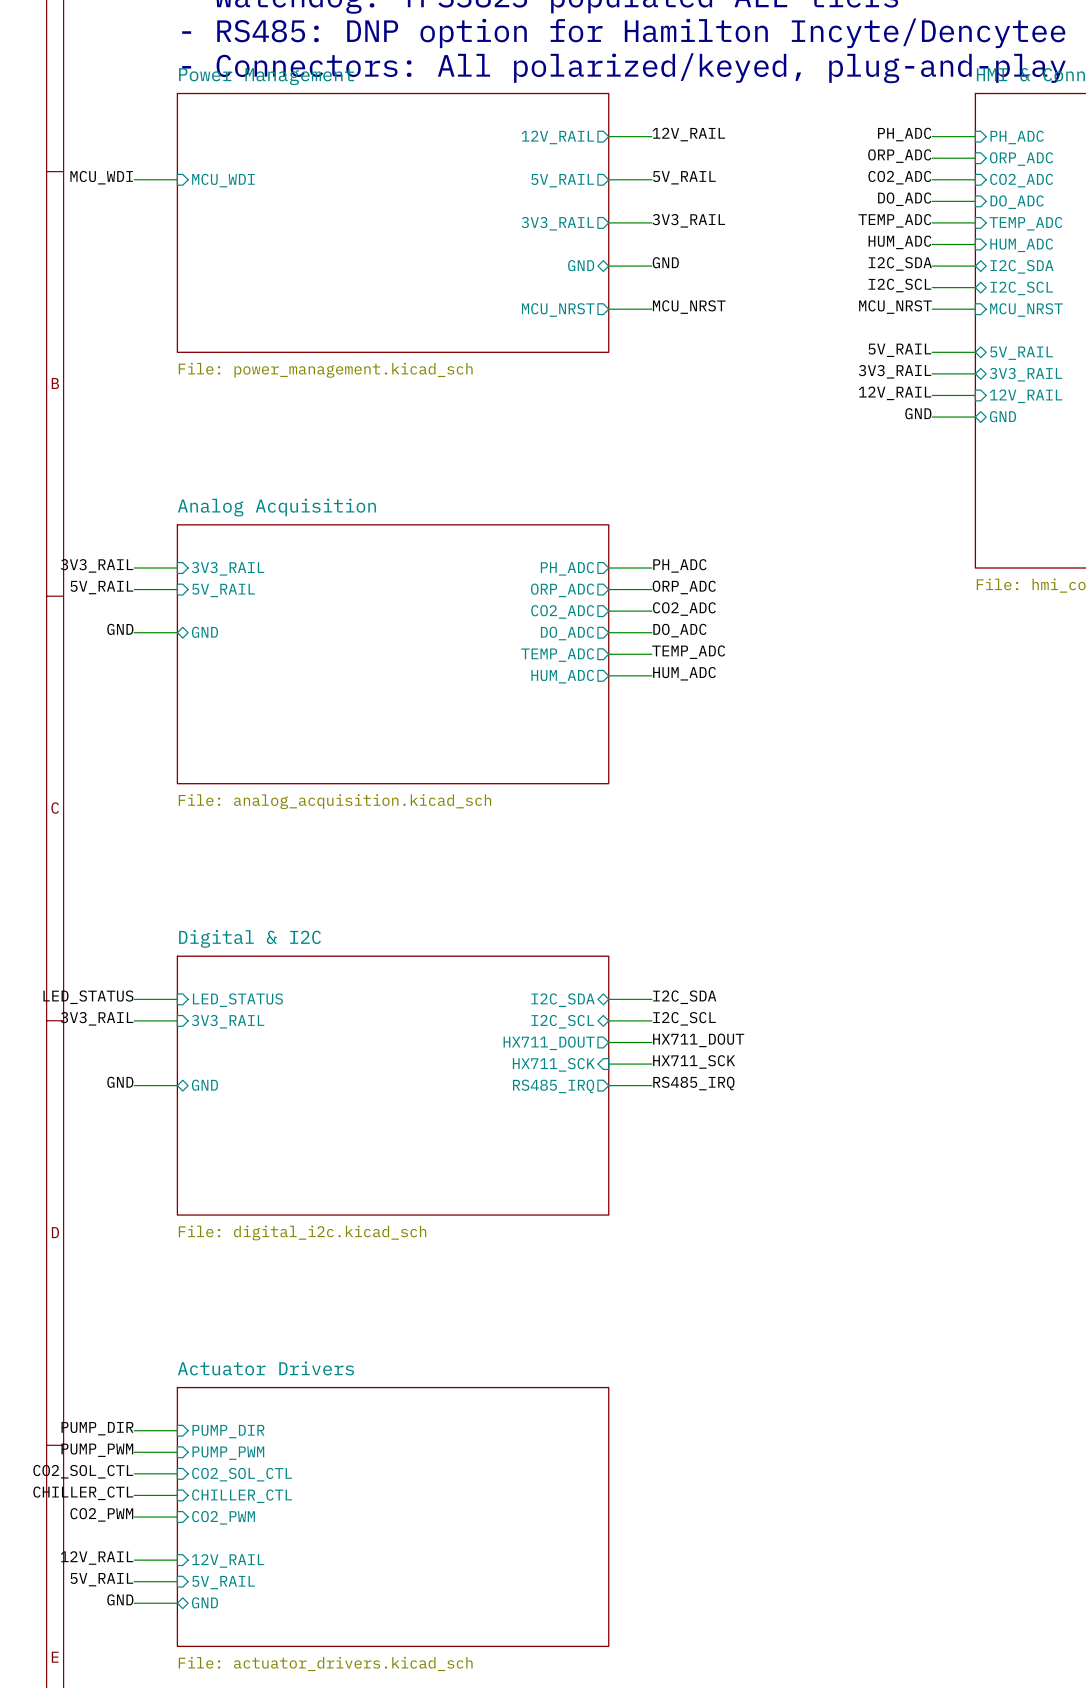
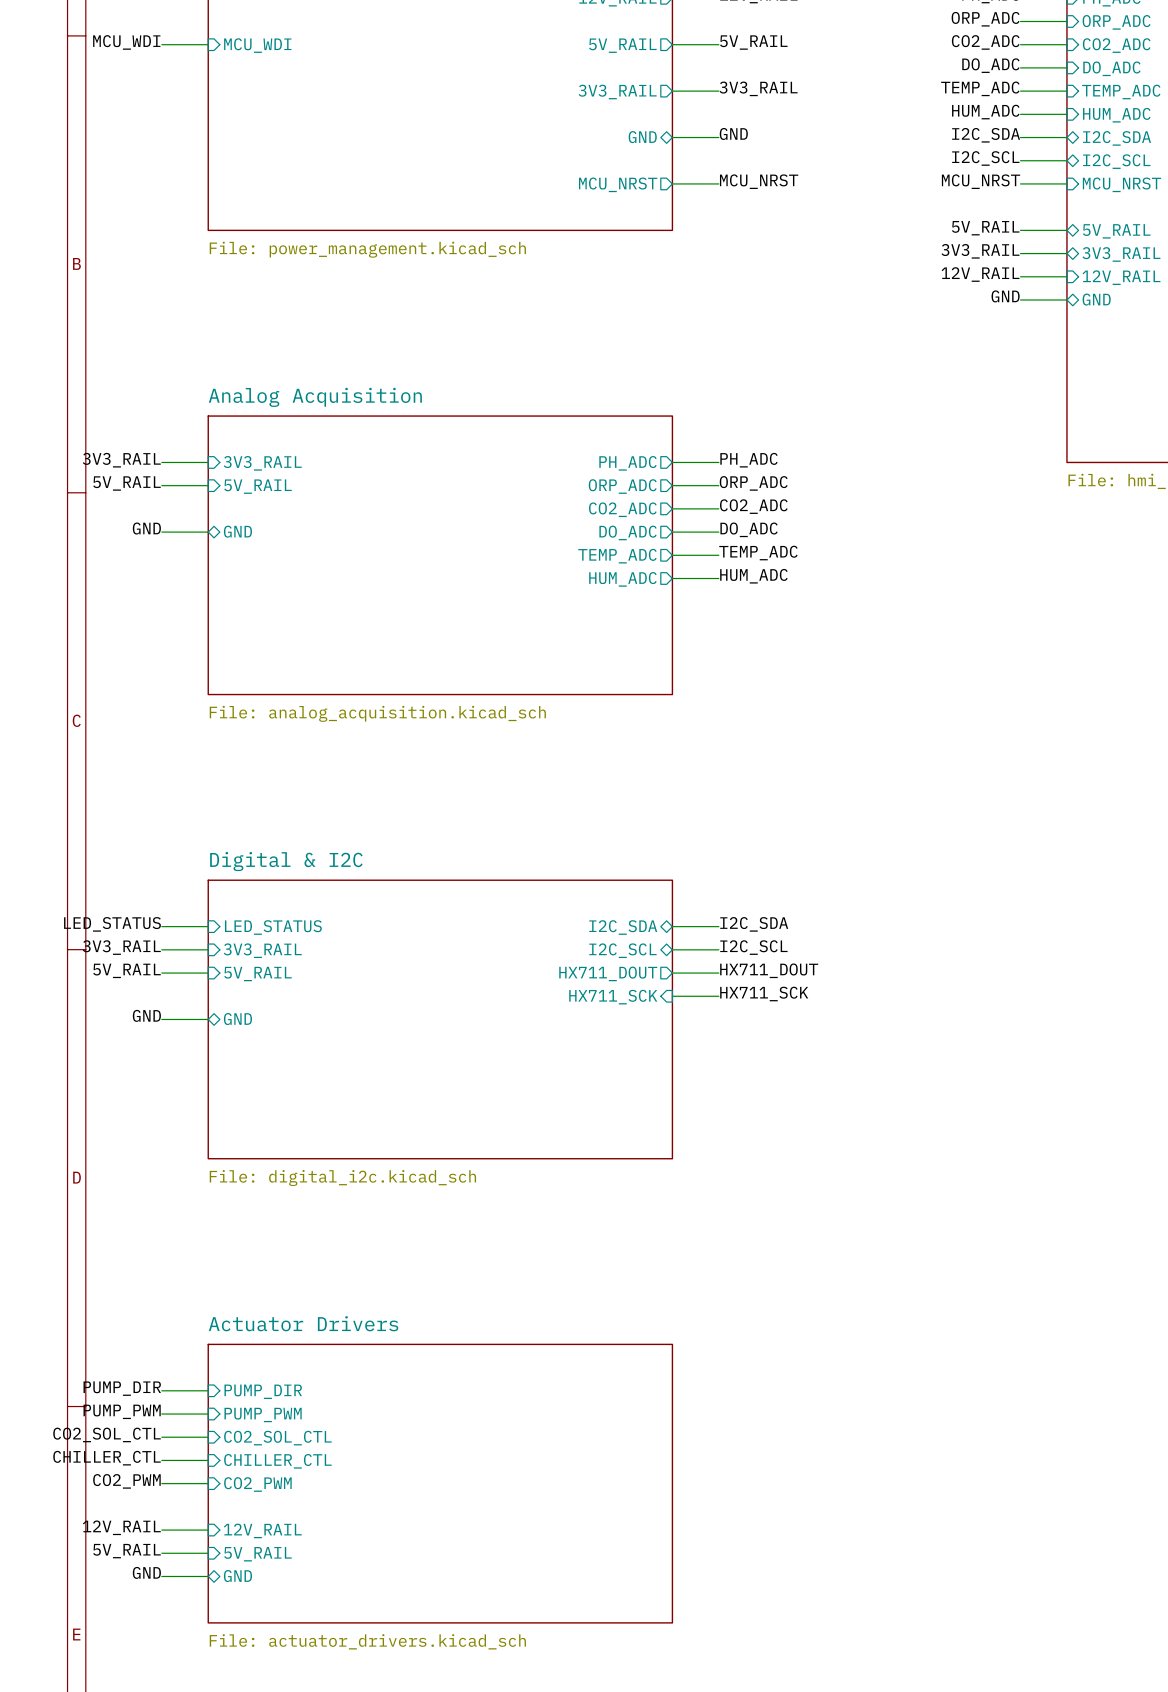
label: none -> 5V_RAIL (126, 970)
wire: none -> (161, 973) (208, 973)
sheet pin: none -> 5V_RAIL (257, 974)
label: RS485_IRQ (693, 1083) -> none
wire: (608, 1085) (651, 1085) -> none
sheet pin: RS485_IRQ (553, 1086) -> none

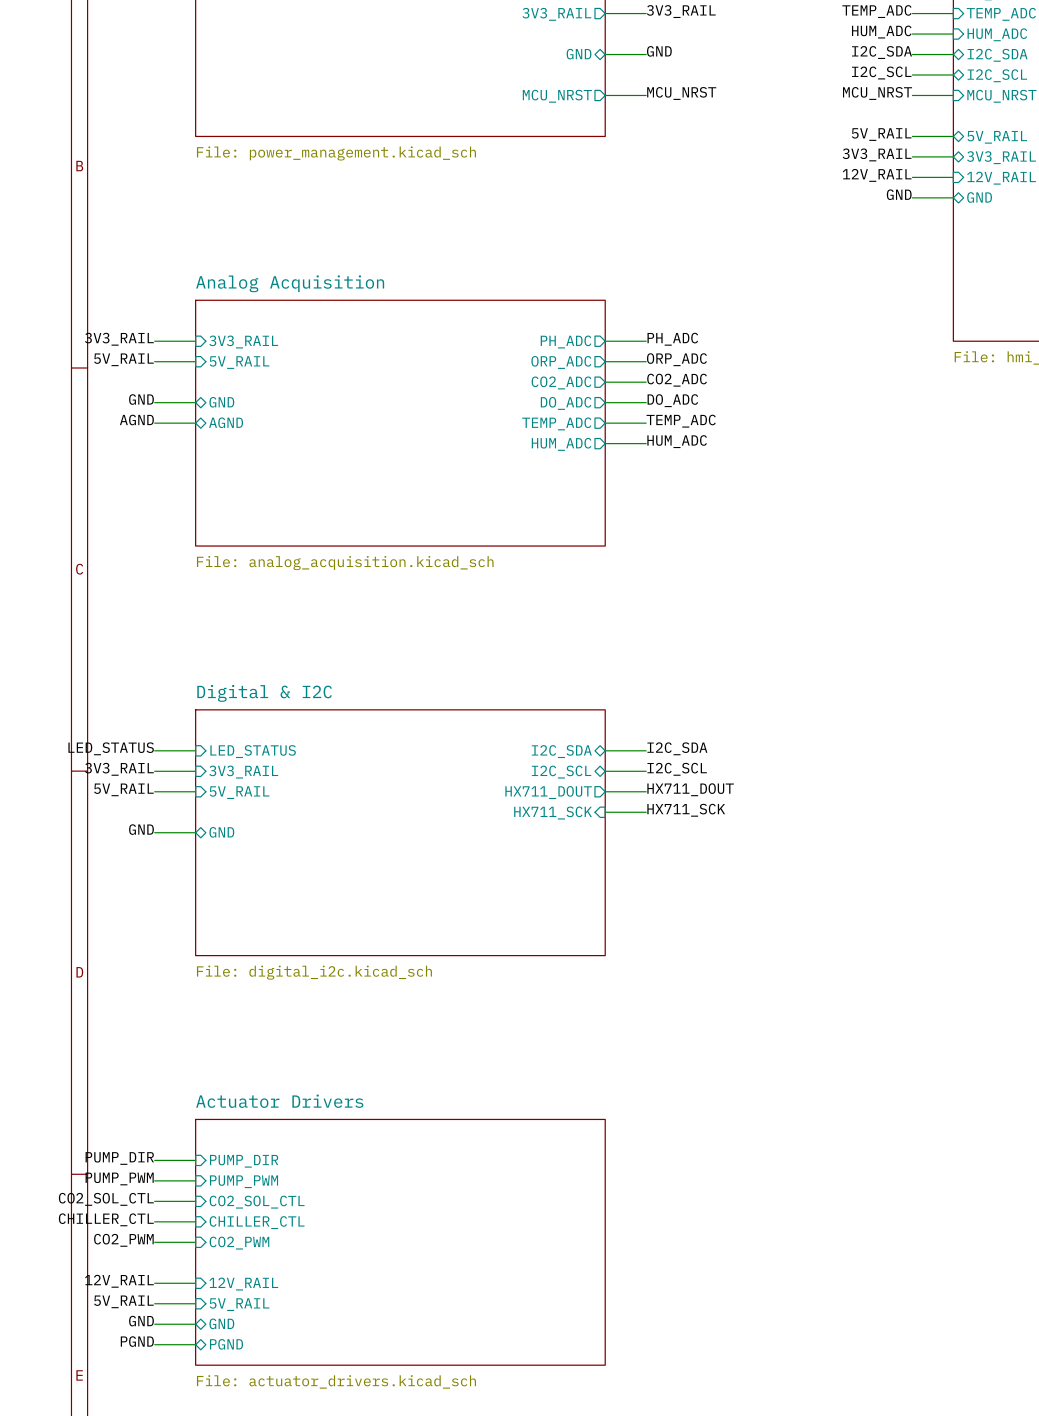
label: none -> AGND (136, 420)
sheet pin: none -> AGND (226, 422)
wire: none -> (154, 423) (195, 423)
label: none -> PGND (137, 1341)
wire: none -> (154, 1344) (195, 1344)
sheet pin: none -> PGND (226, 1344)

